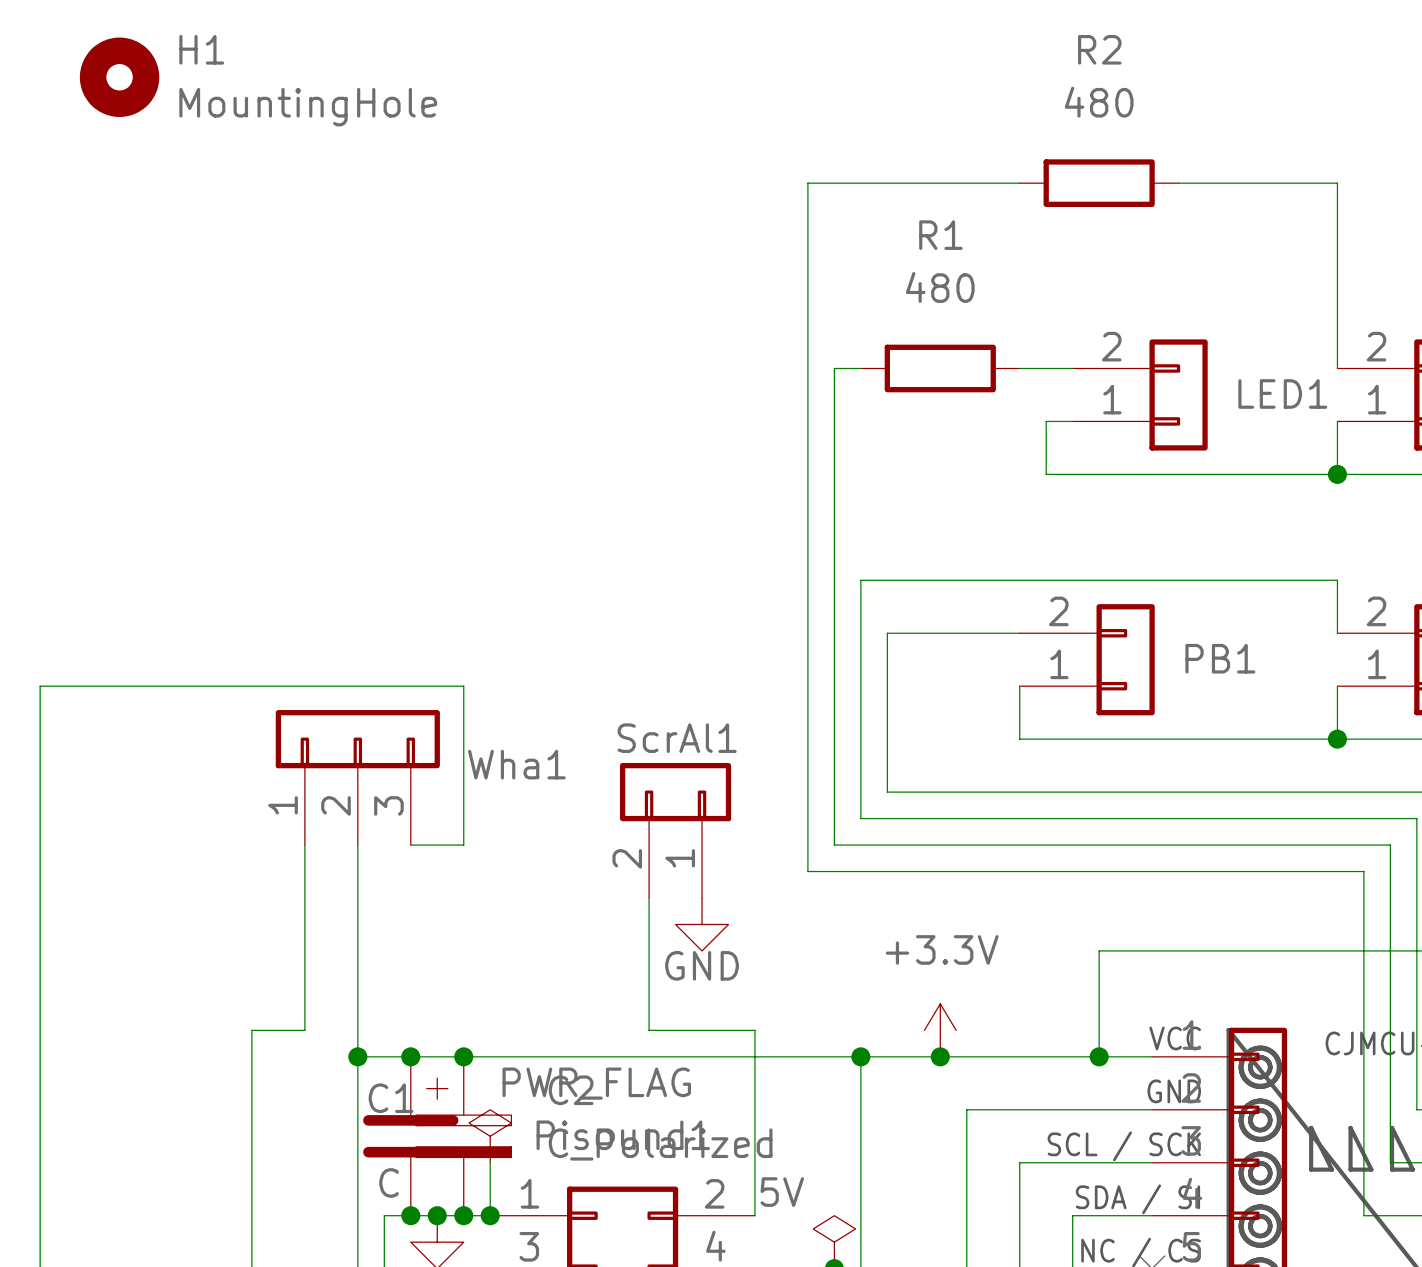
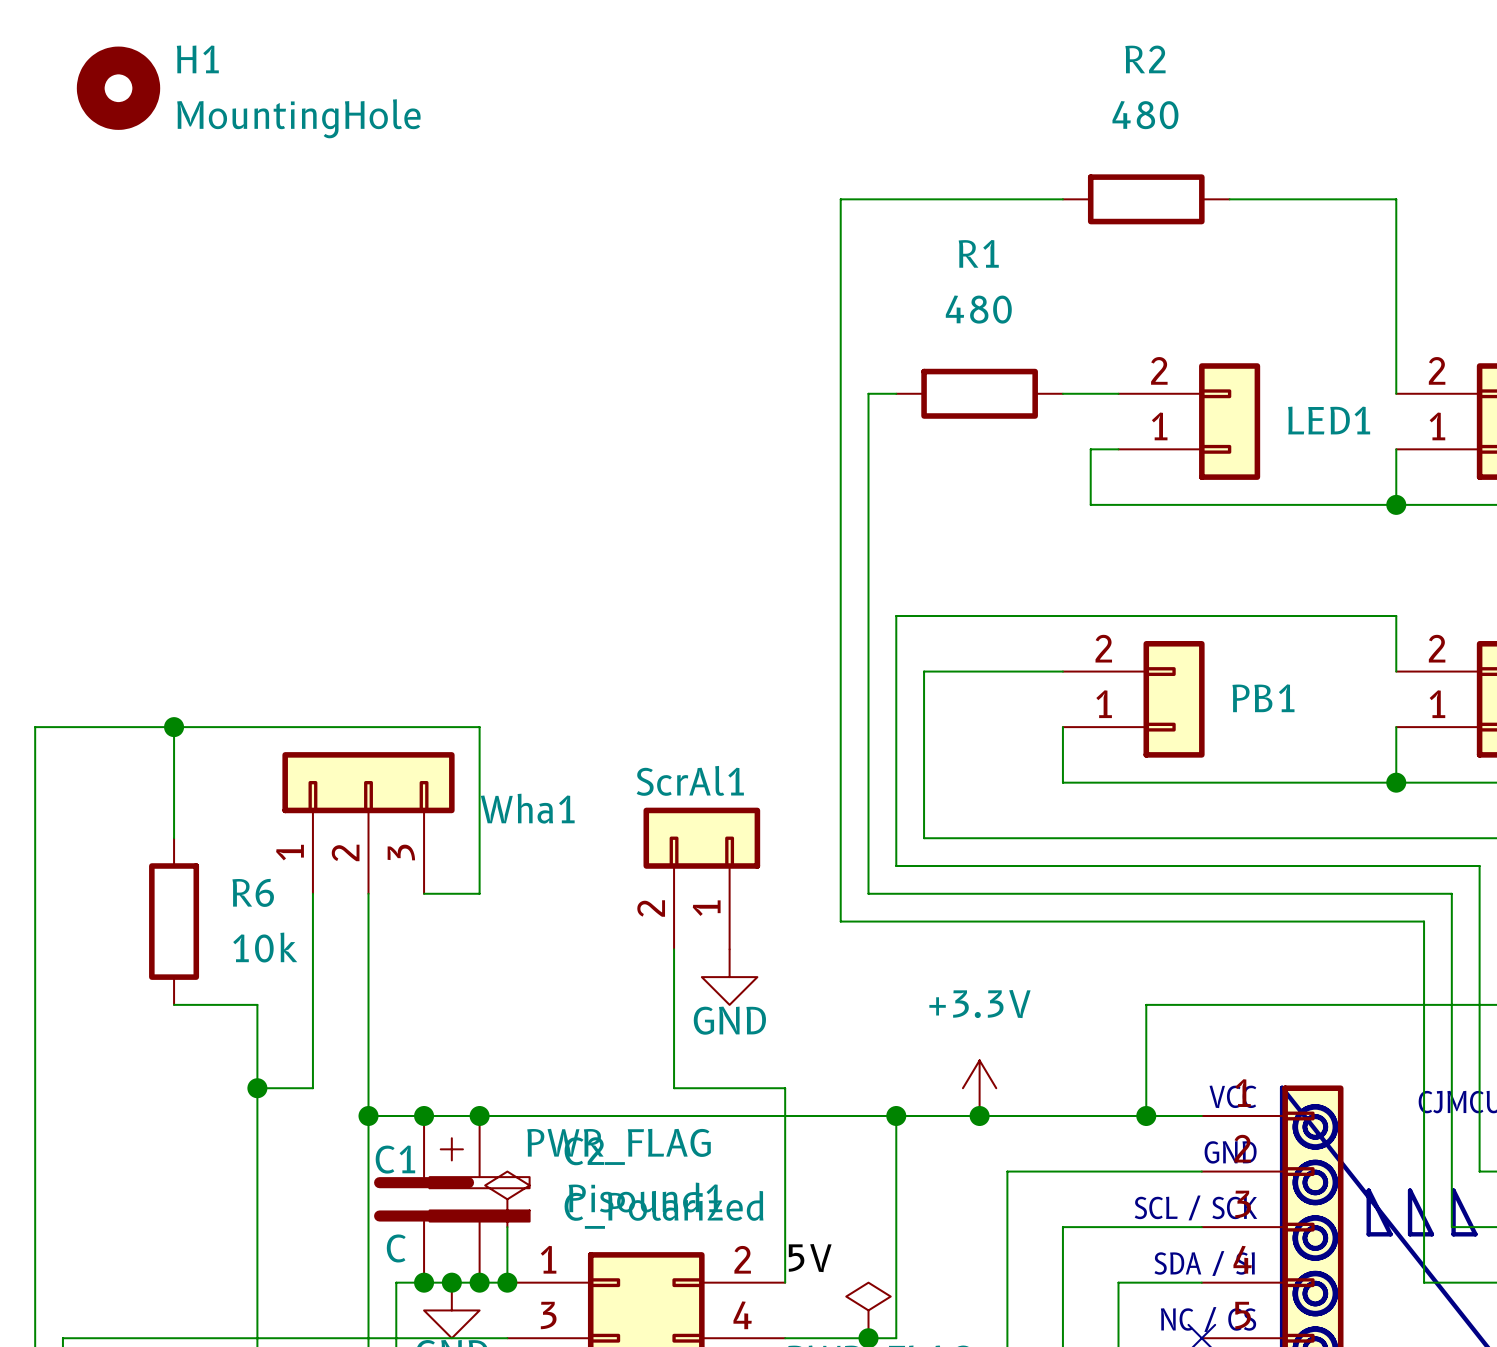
wire: none -> (174, 727) (174, 838)
junction: none -> (174, 727)
R6: none -> 10k (174, 921)
wire: none -> (174, 1004) (257, 1004) (257, 1088)
junction: none -> (257, 1088)

